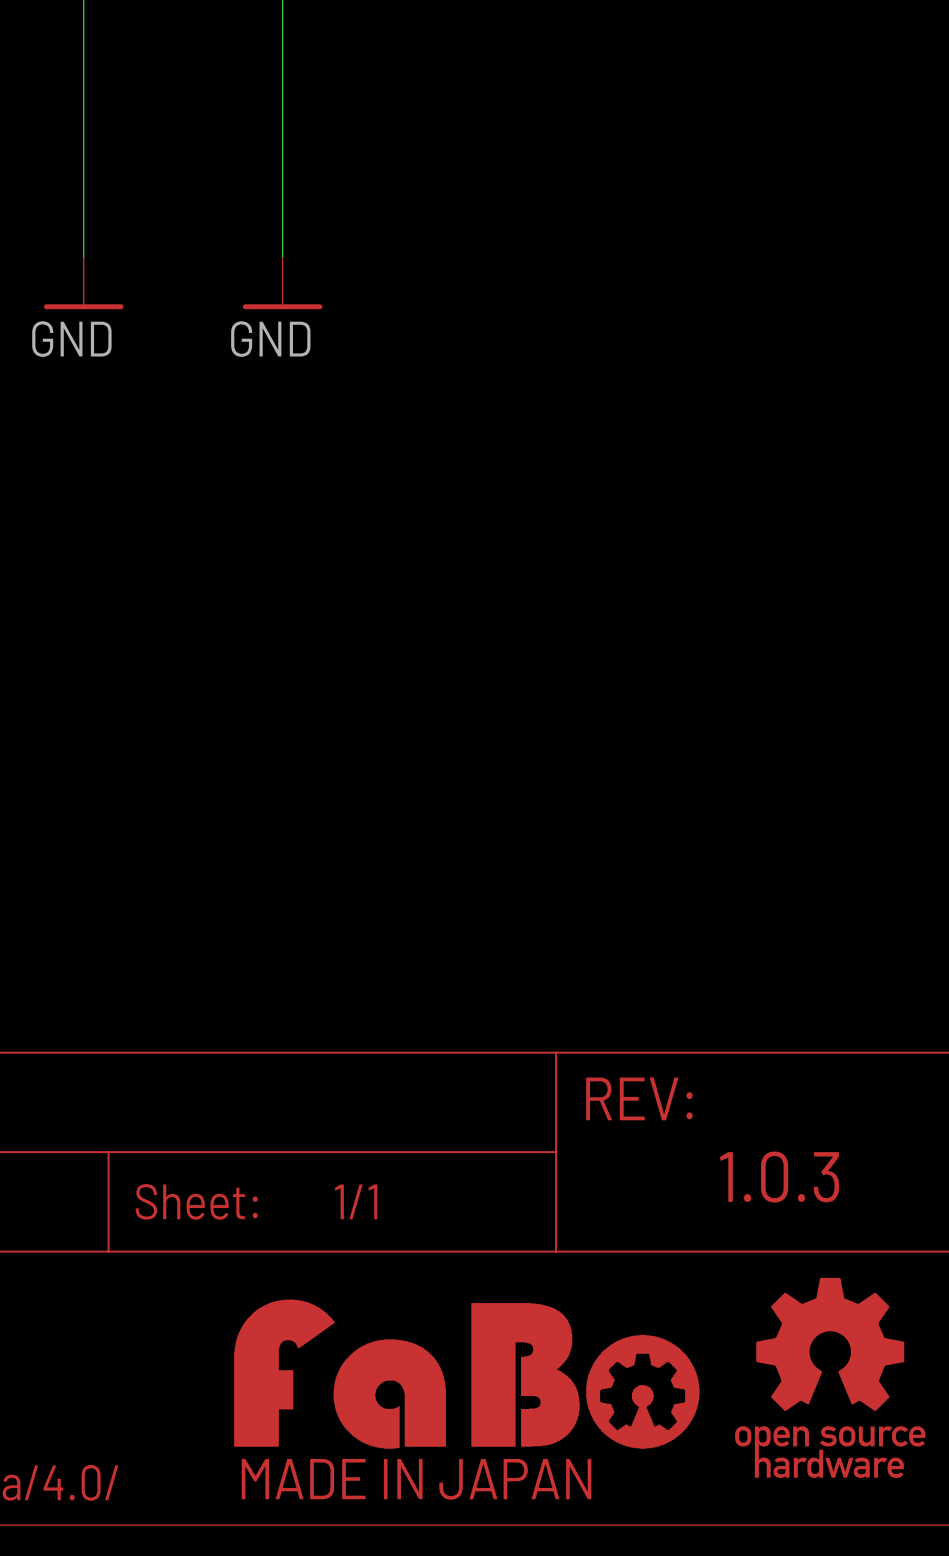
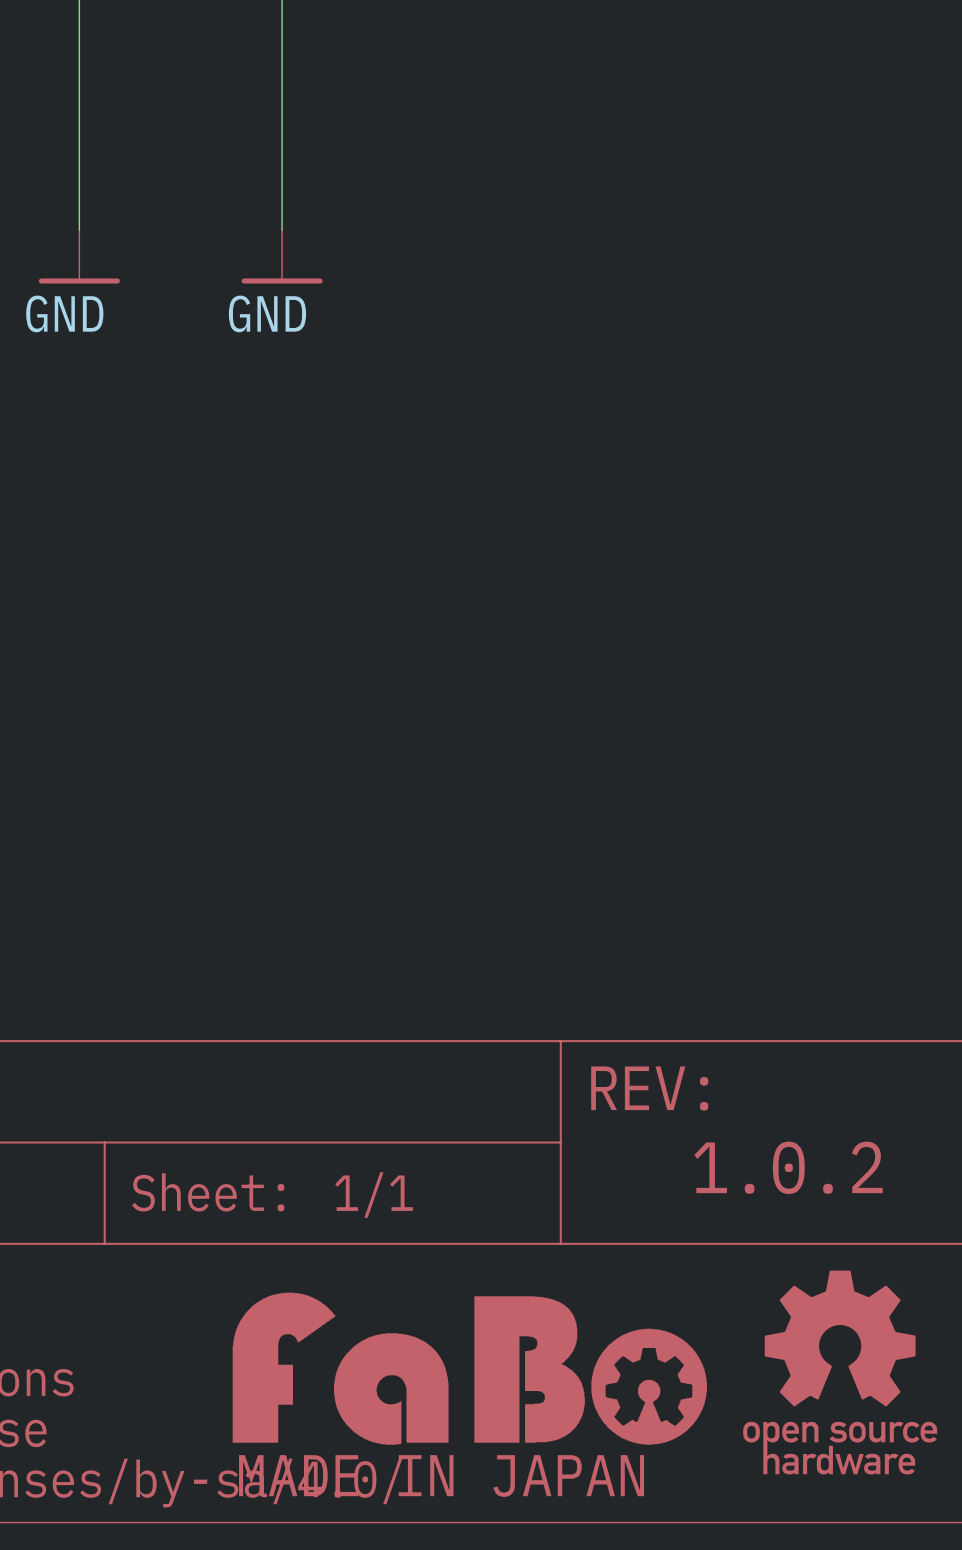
text: 1.0.3 (779, 1177) -> 1.0.2 (788, 1167)

